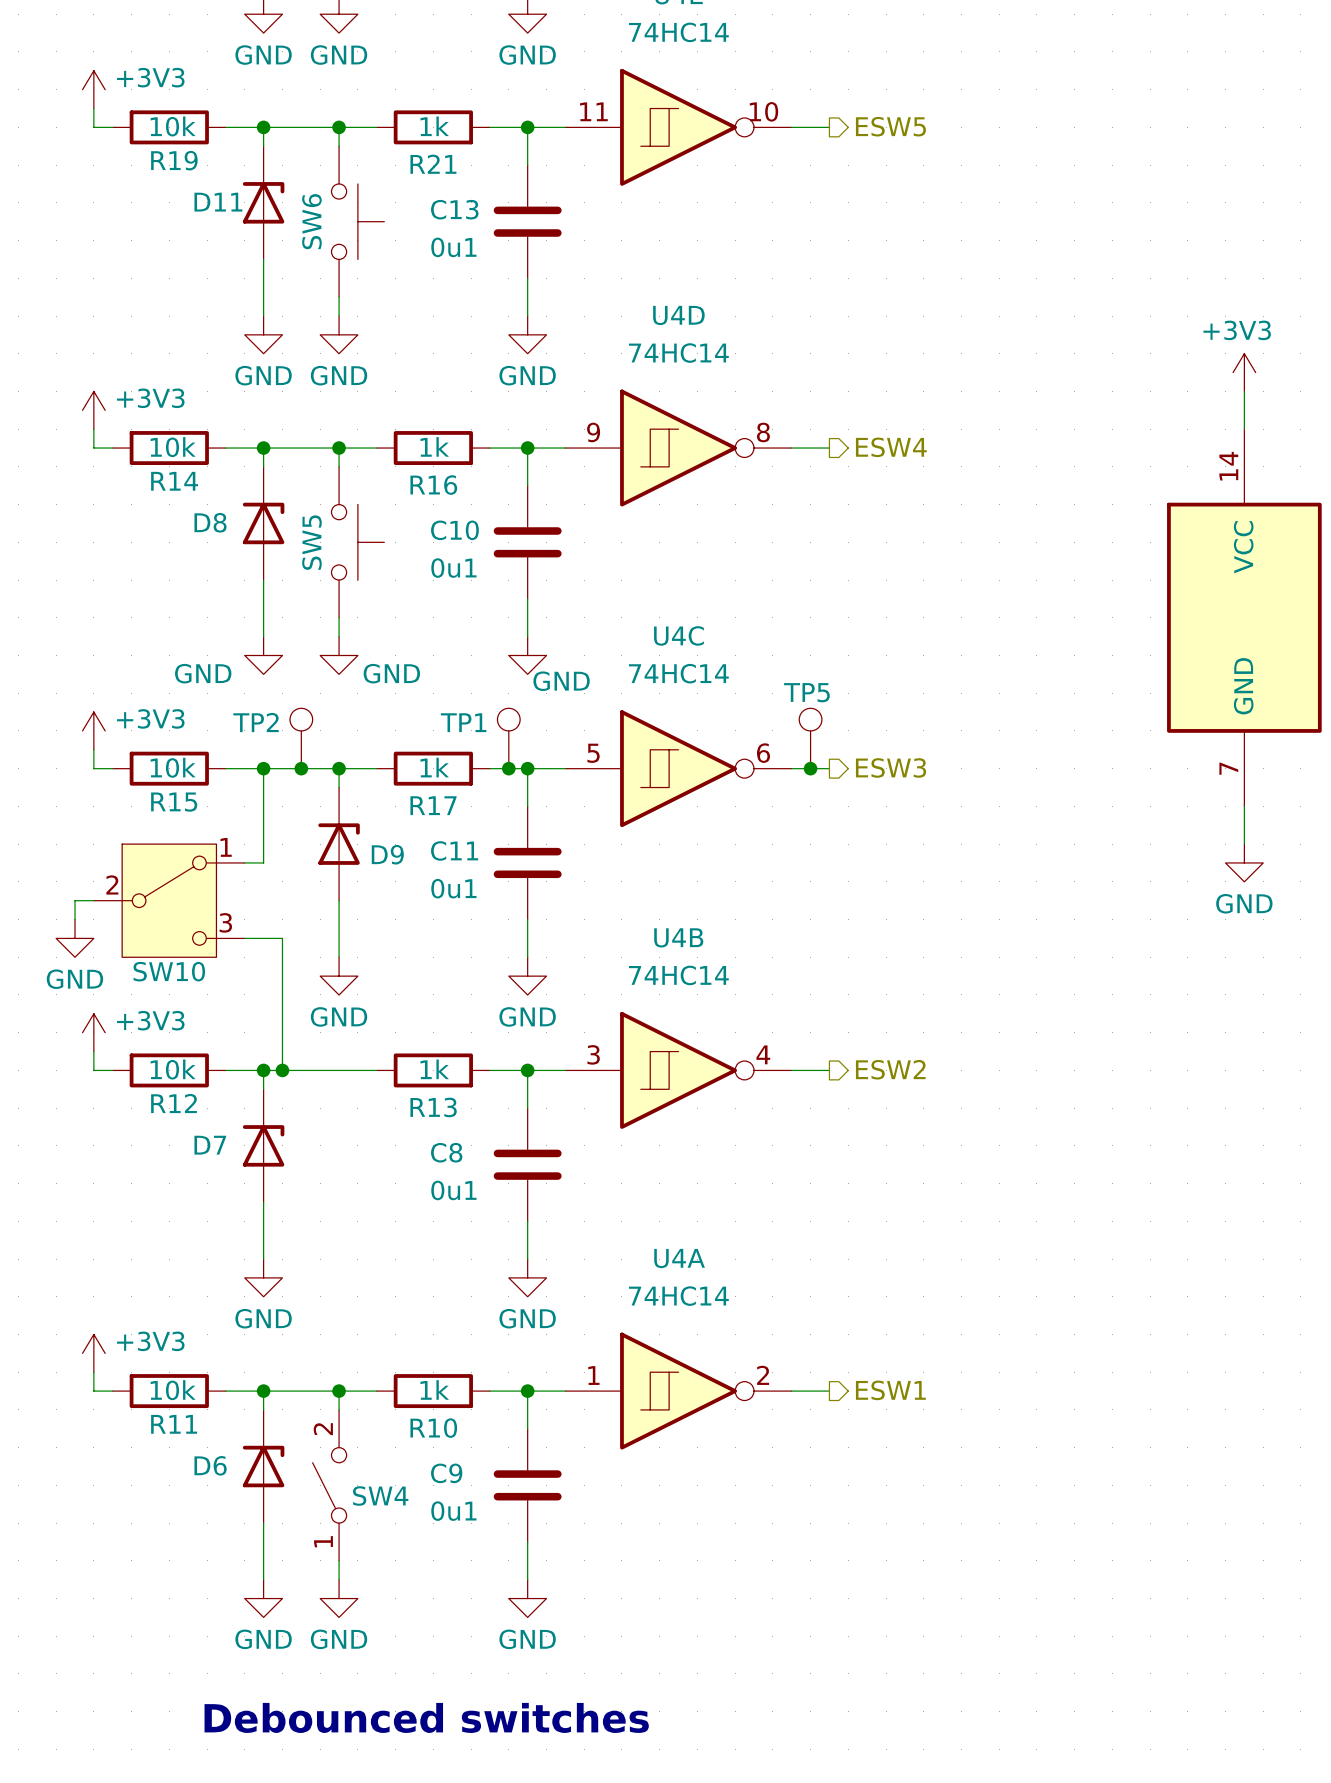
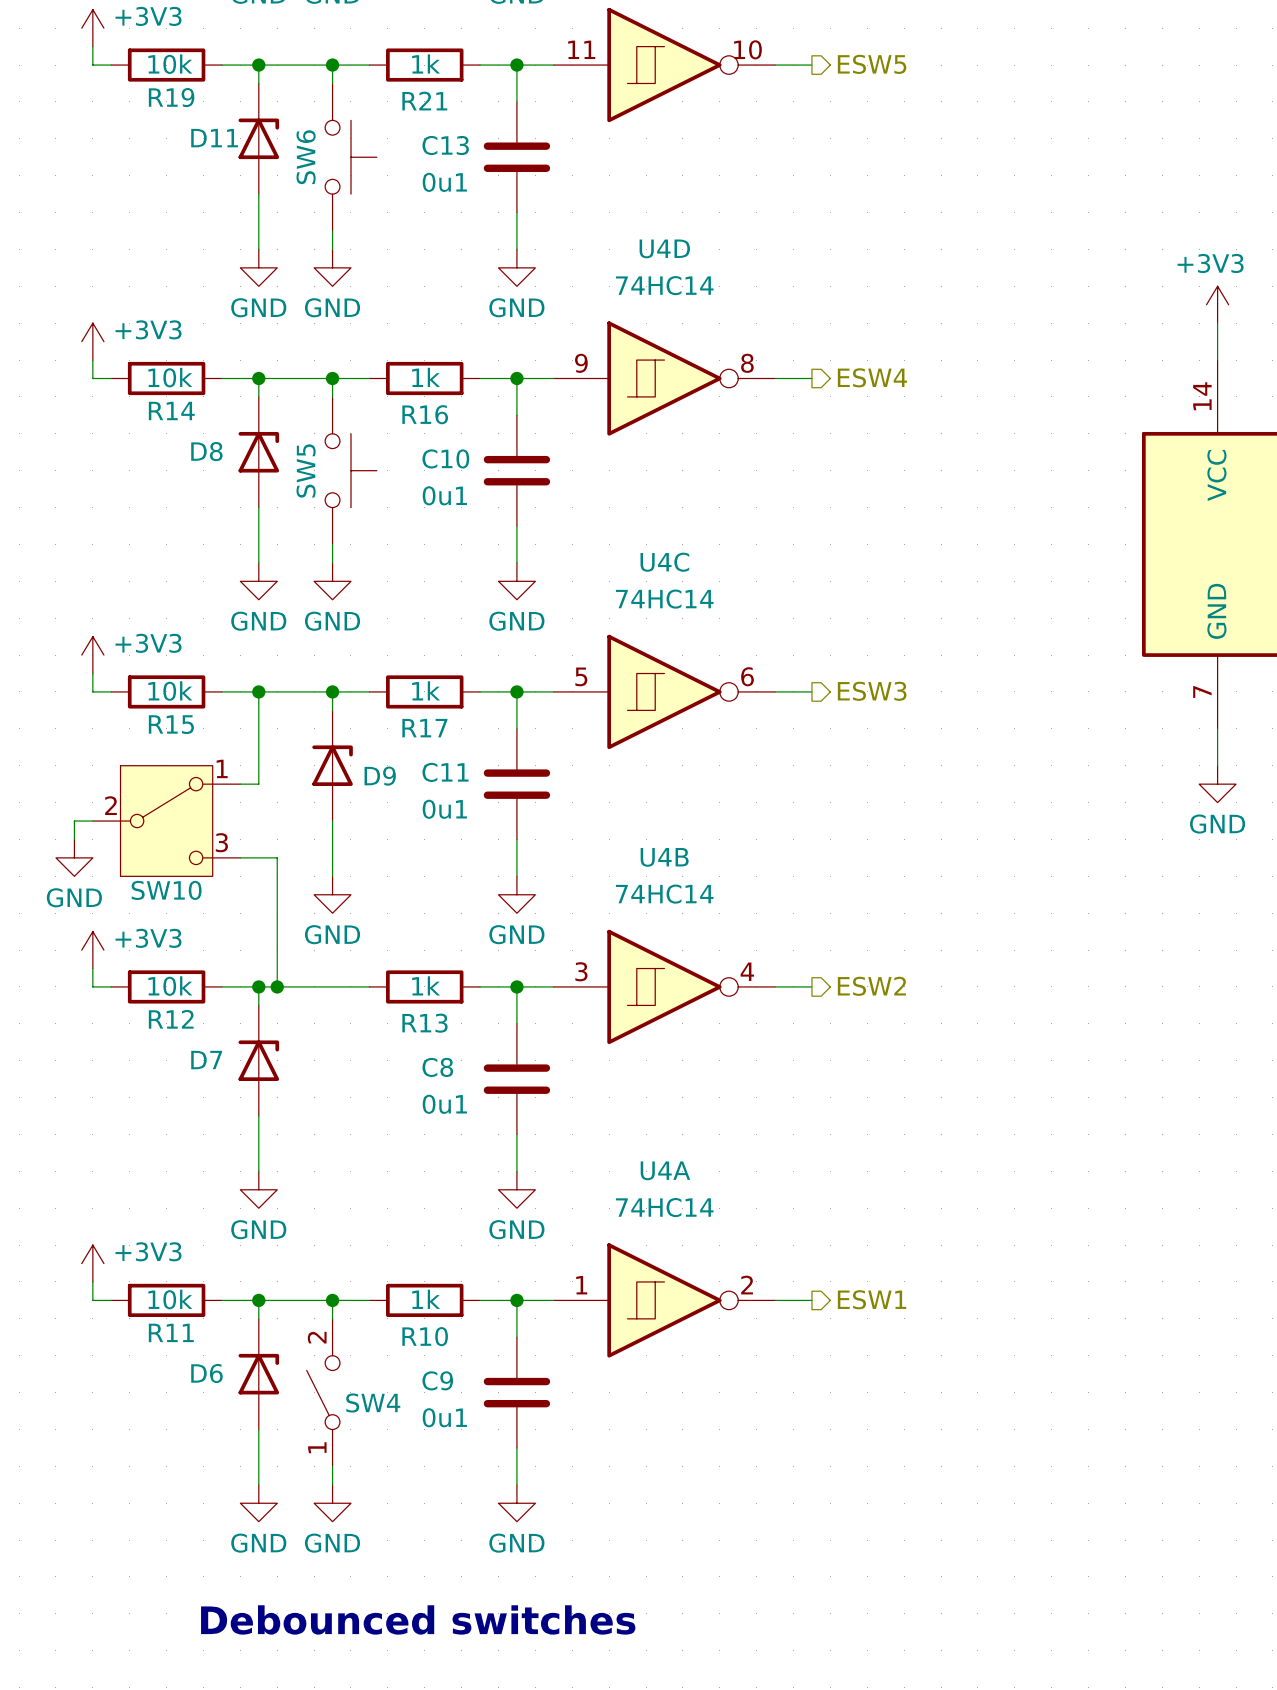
power symbol text position: GND (203, 673) -> GND (258, 621)
power symbol text position: GND (391, 673) -> GND (332, 621)
power symbol text position: GND (561, 681) -> GND (516, 621)
TP2: (301, 738) -> none
TP1: (508, 738) -> none
TP5: (810, 738) -> none
junction: (301, 768) -> none
junction: (508, 768) -> none
junction: (810, 768) -> none

